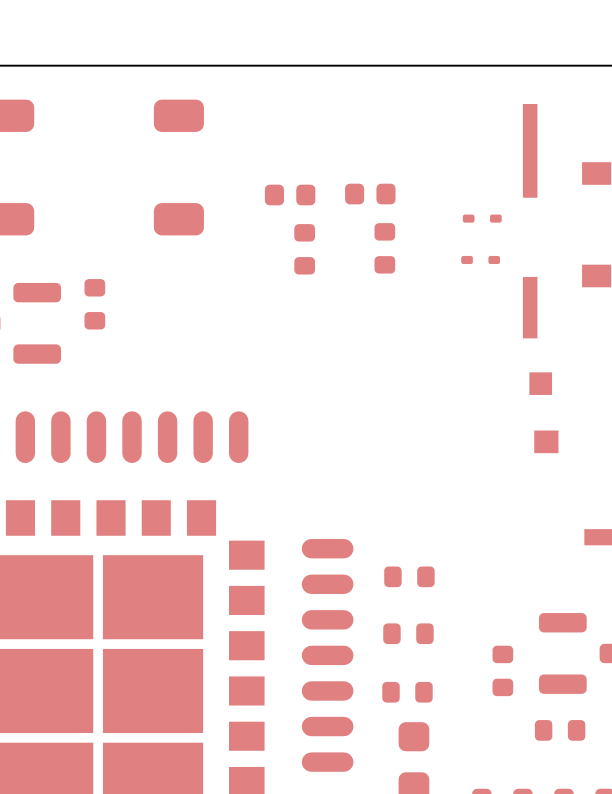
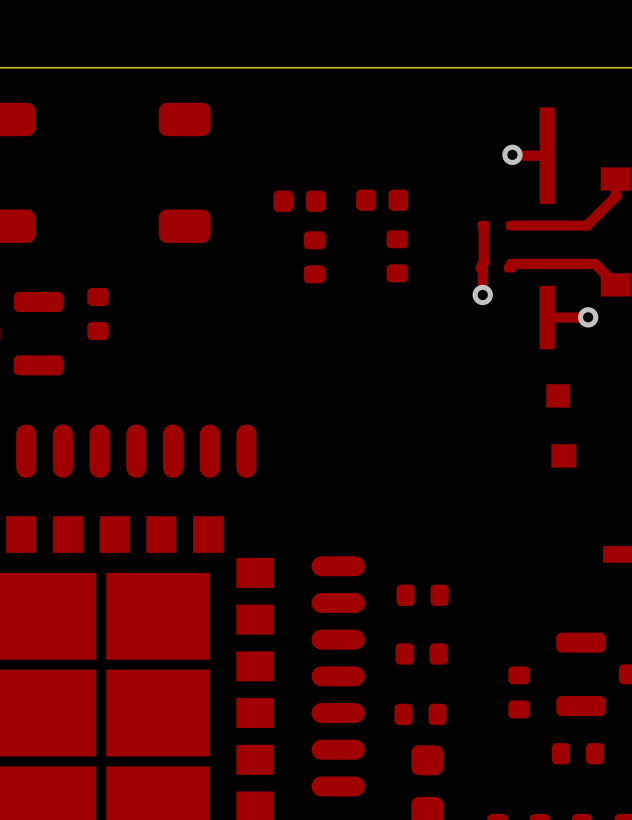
top track: none -> (512, 154) (547, 155)
via: none -> (512, 154)
top track: none -> (615, 179) (615, 196) (586, 225) (511, 225)
top track: none -> (483, 225) (482, 294)
top track: none -> (510, 263) (594, 263) (615, 284)
via: none -> (482, 294)
top track: none -> (588, 317) (547, 317)
via: none -> (588, 317)

